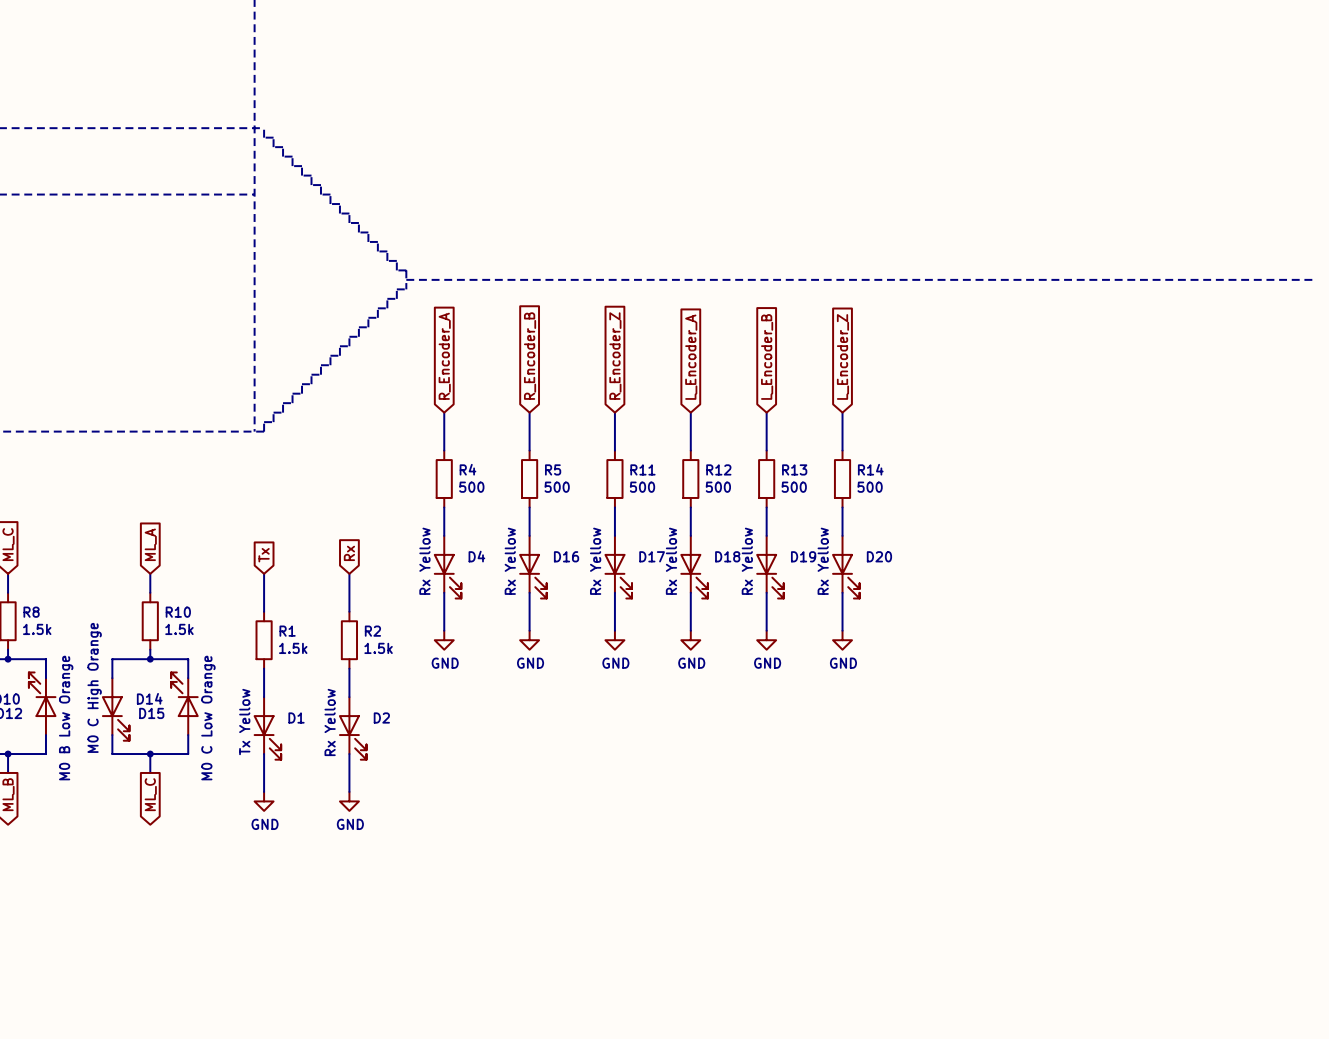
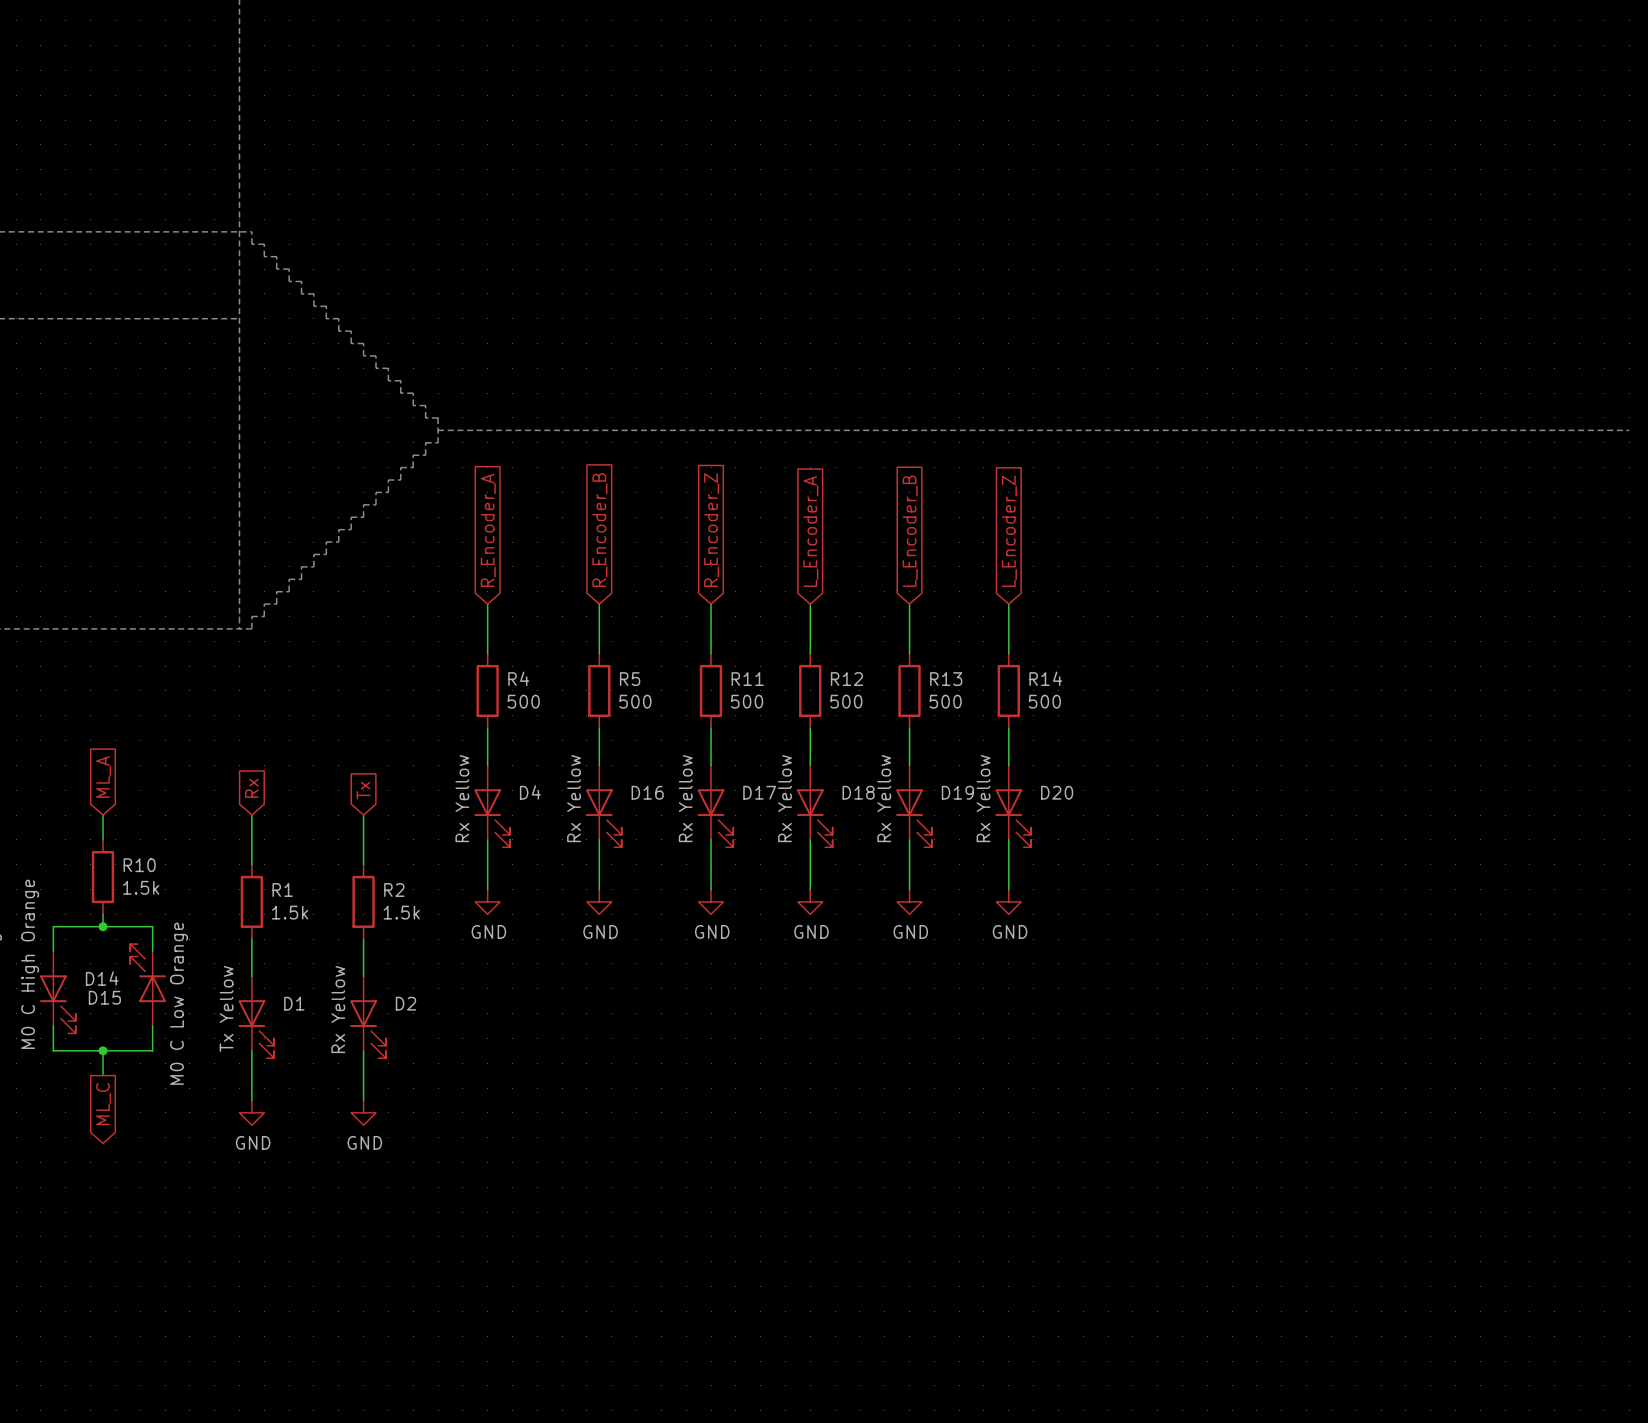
global label: Rx (349, 553) -> Tx (363, 790)
global label: Tx (264, 555) -> Rx (251, 788)

